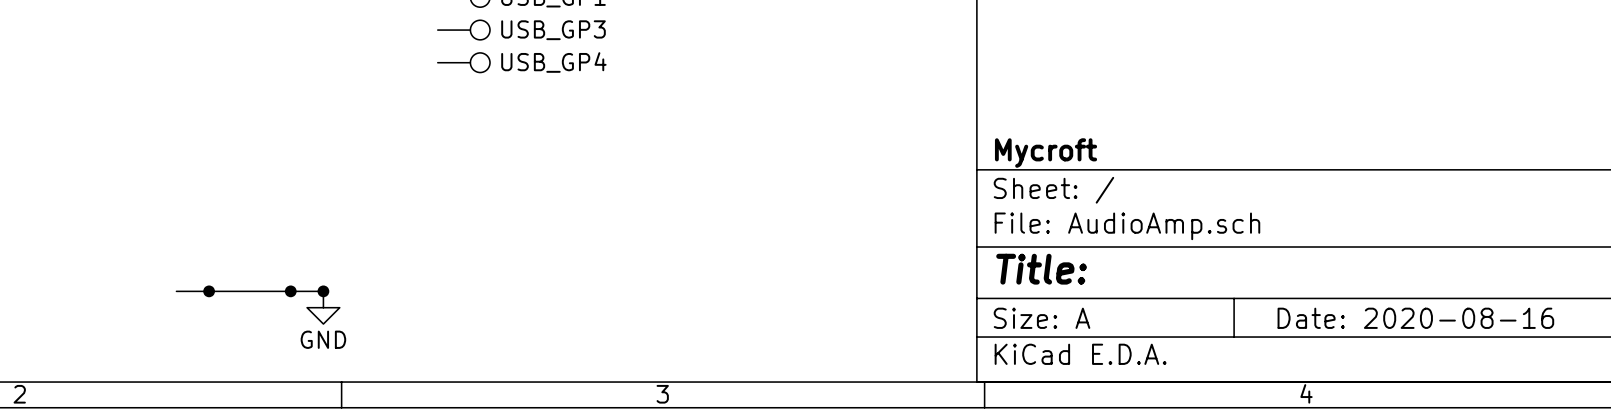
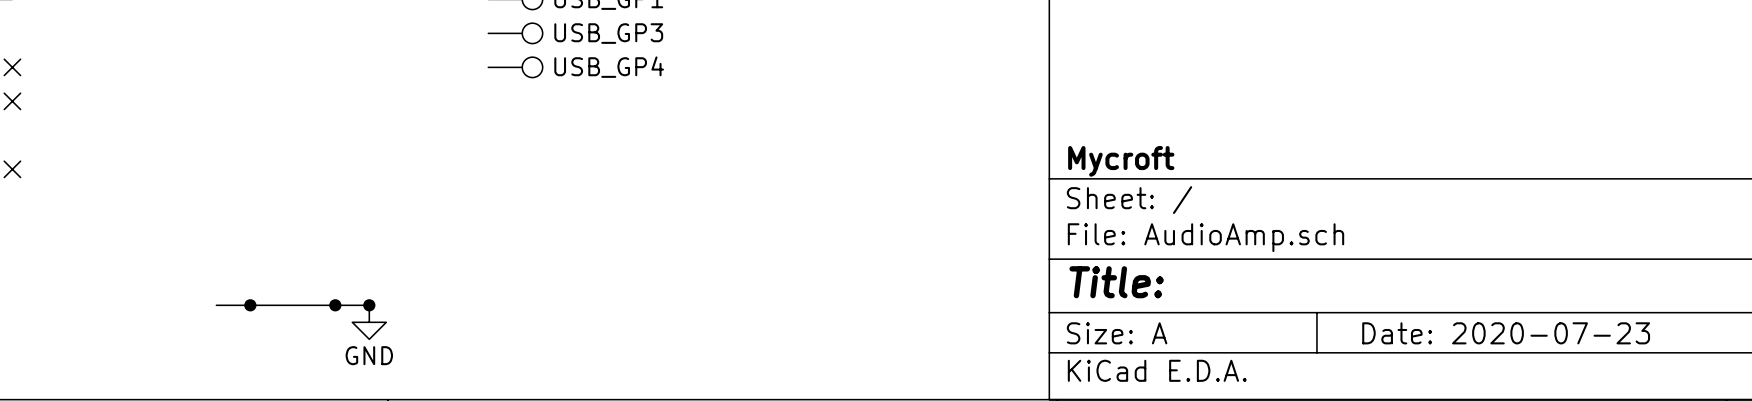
title block: Date: 2020-08-16 (1415, 318) -> Date: 2020-07-23 (1506, 333)

